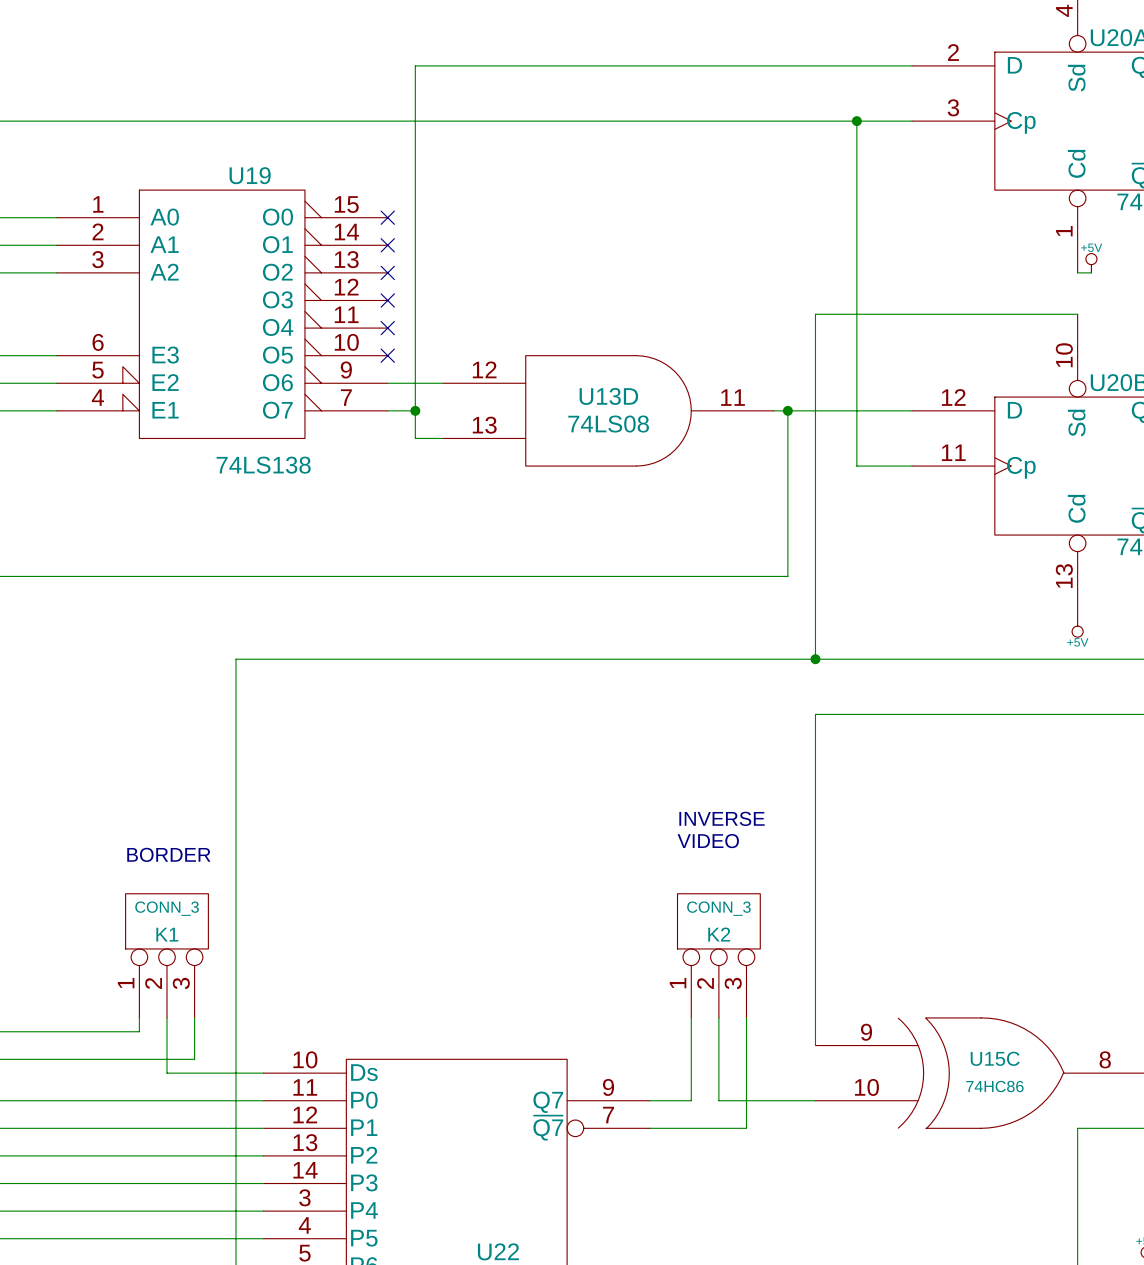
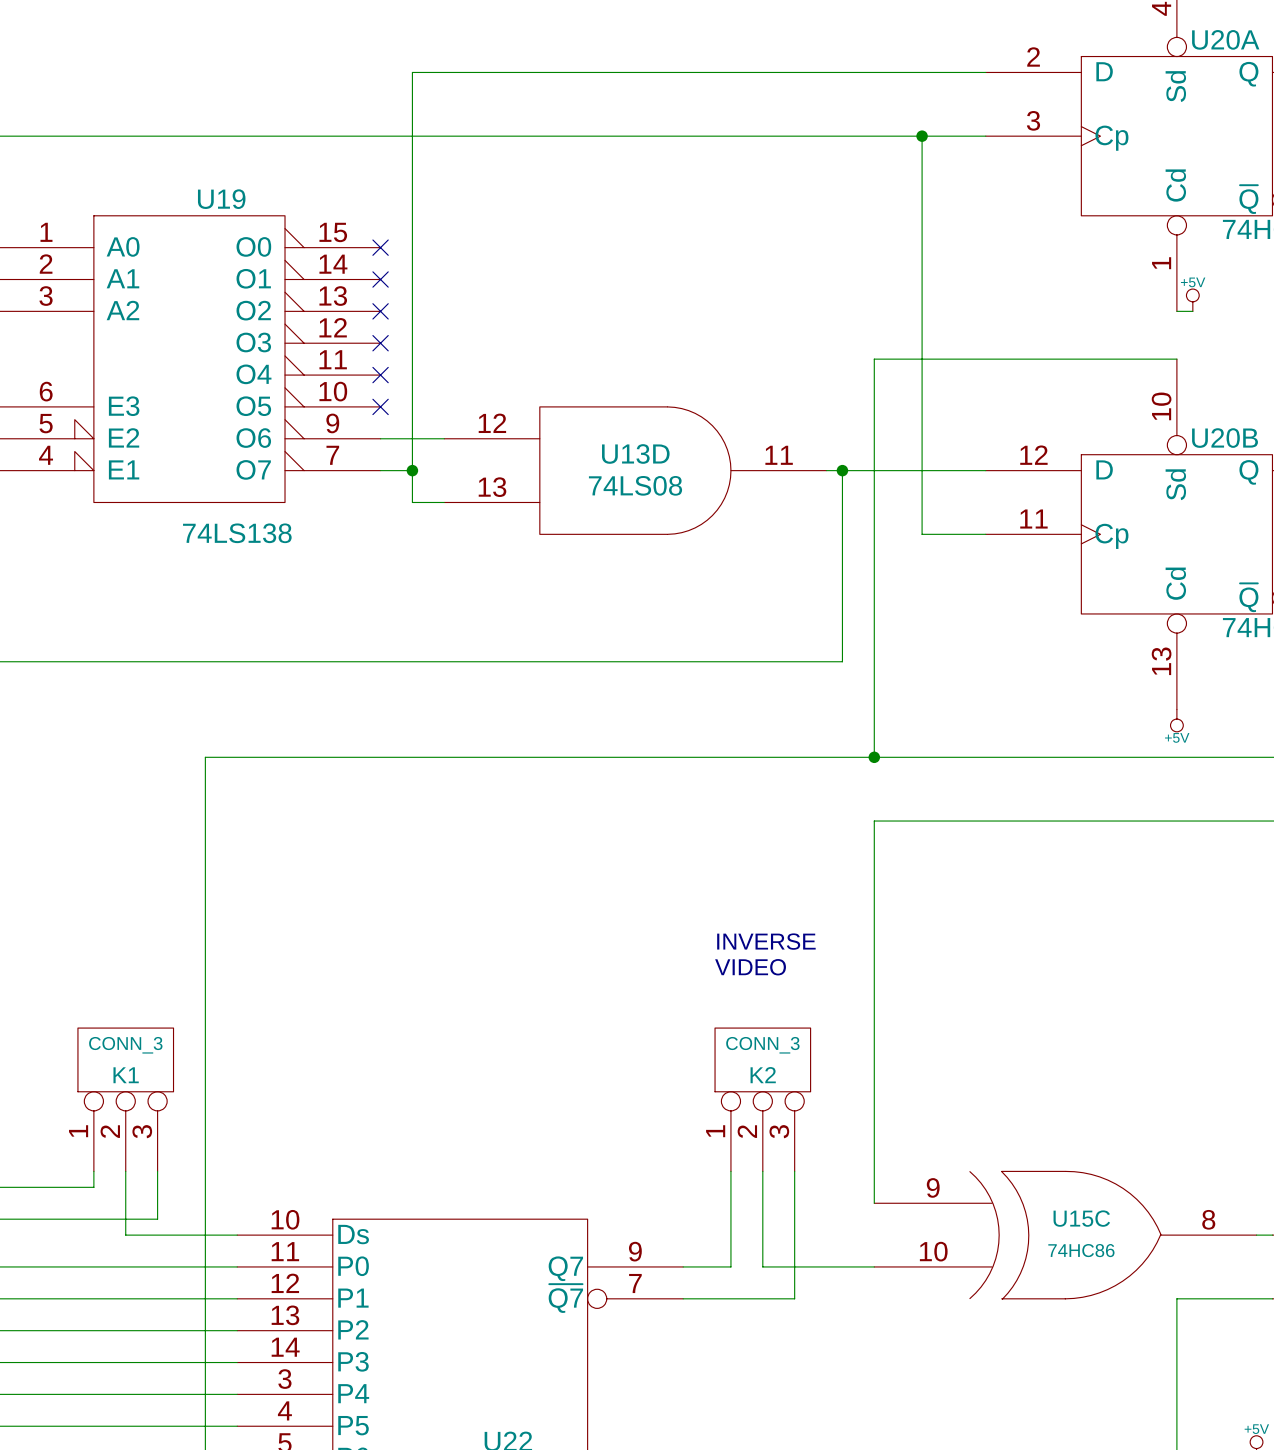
text: BORDER (168, 854) -> none

